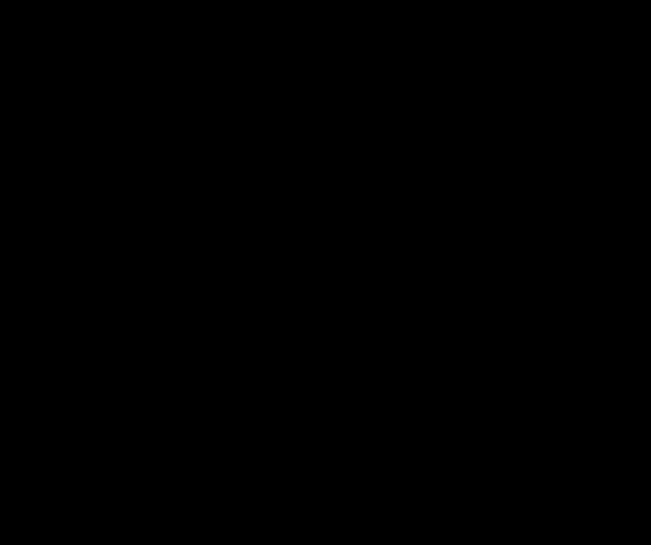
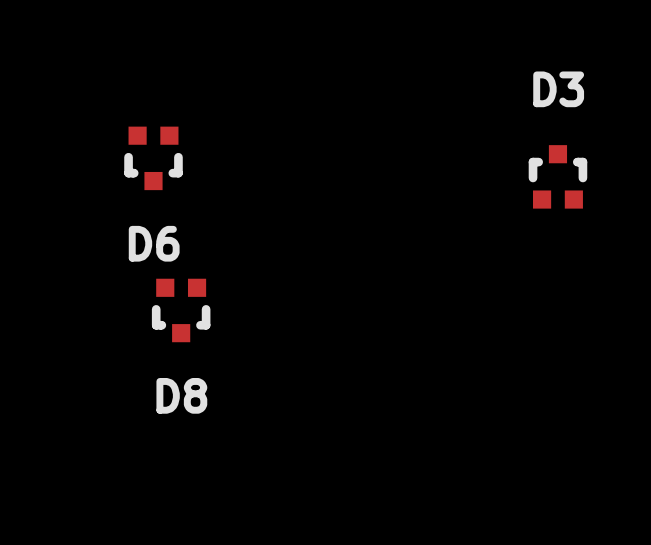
D6: none -> (153, 158)
D3: none -> (557, 176)
D8: none -> (181, 310)

